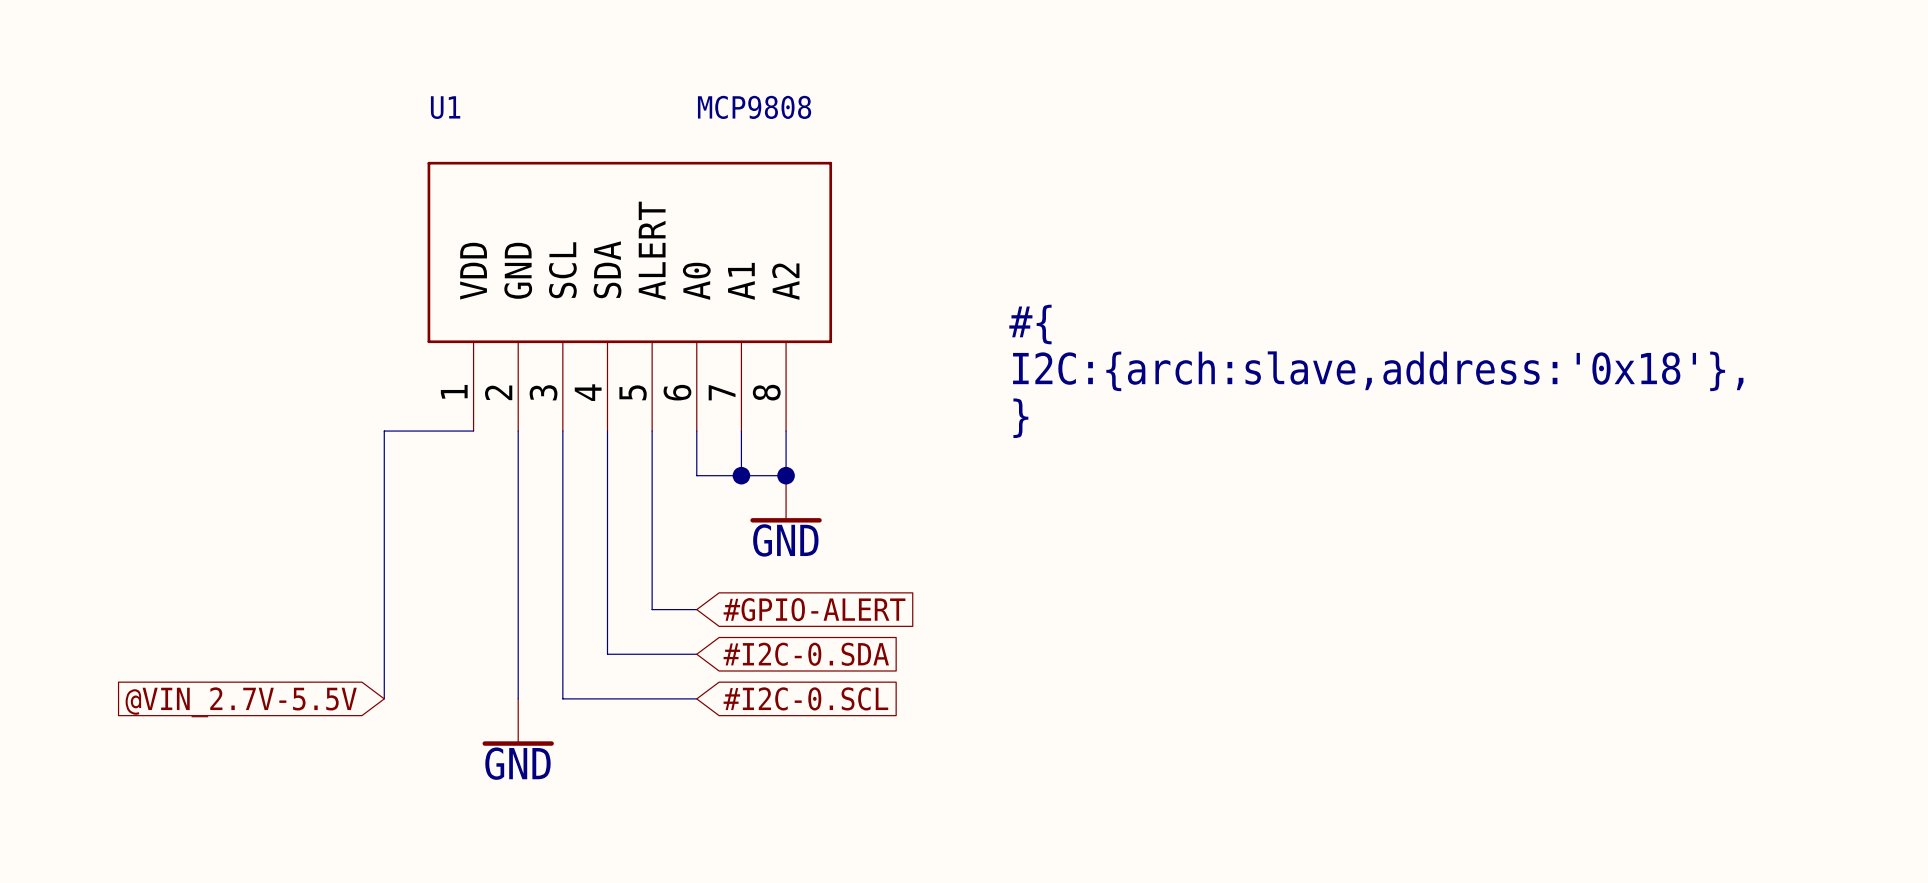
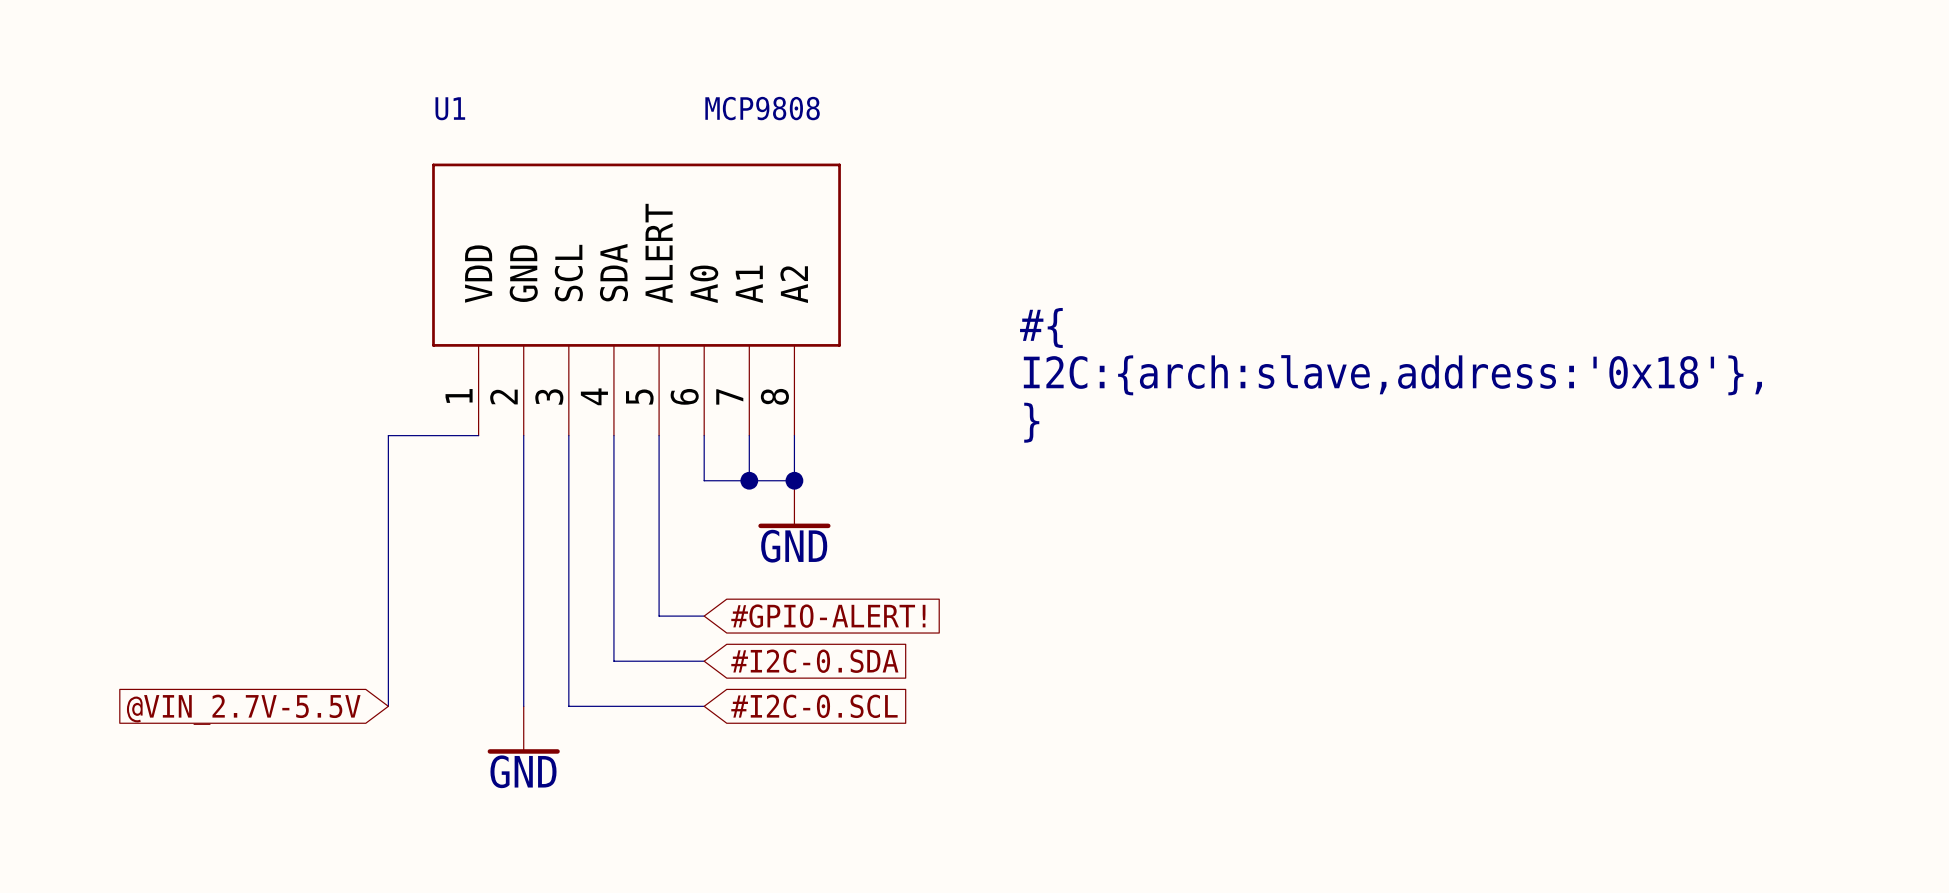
global label: #GPIO-ALERT (814, 609) -> #GPIO-ALERT! (828, 616)

